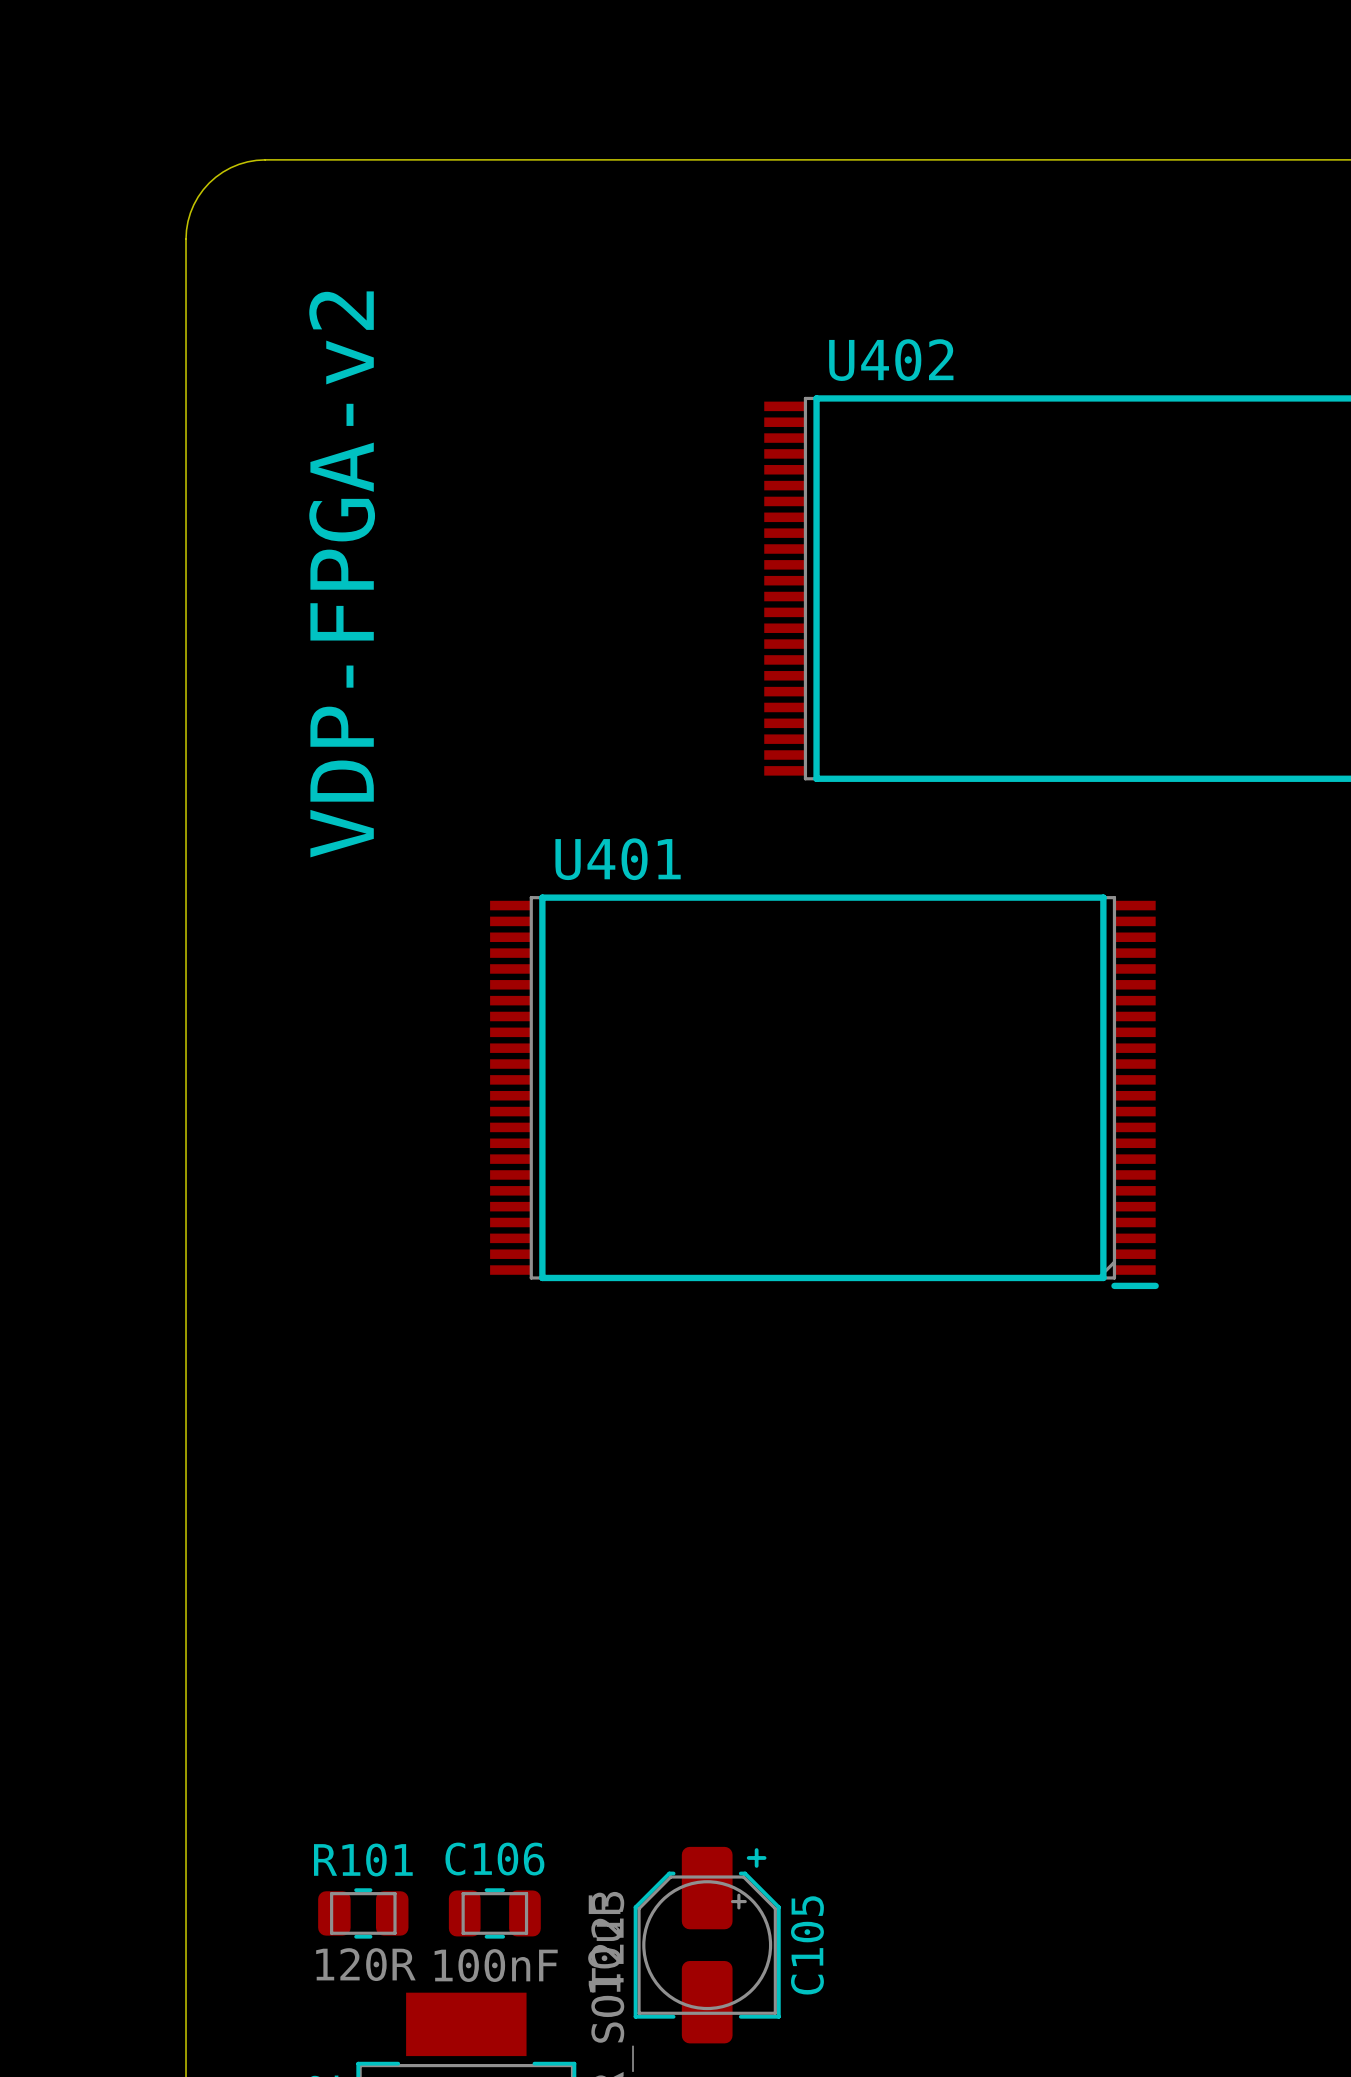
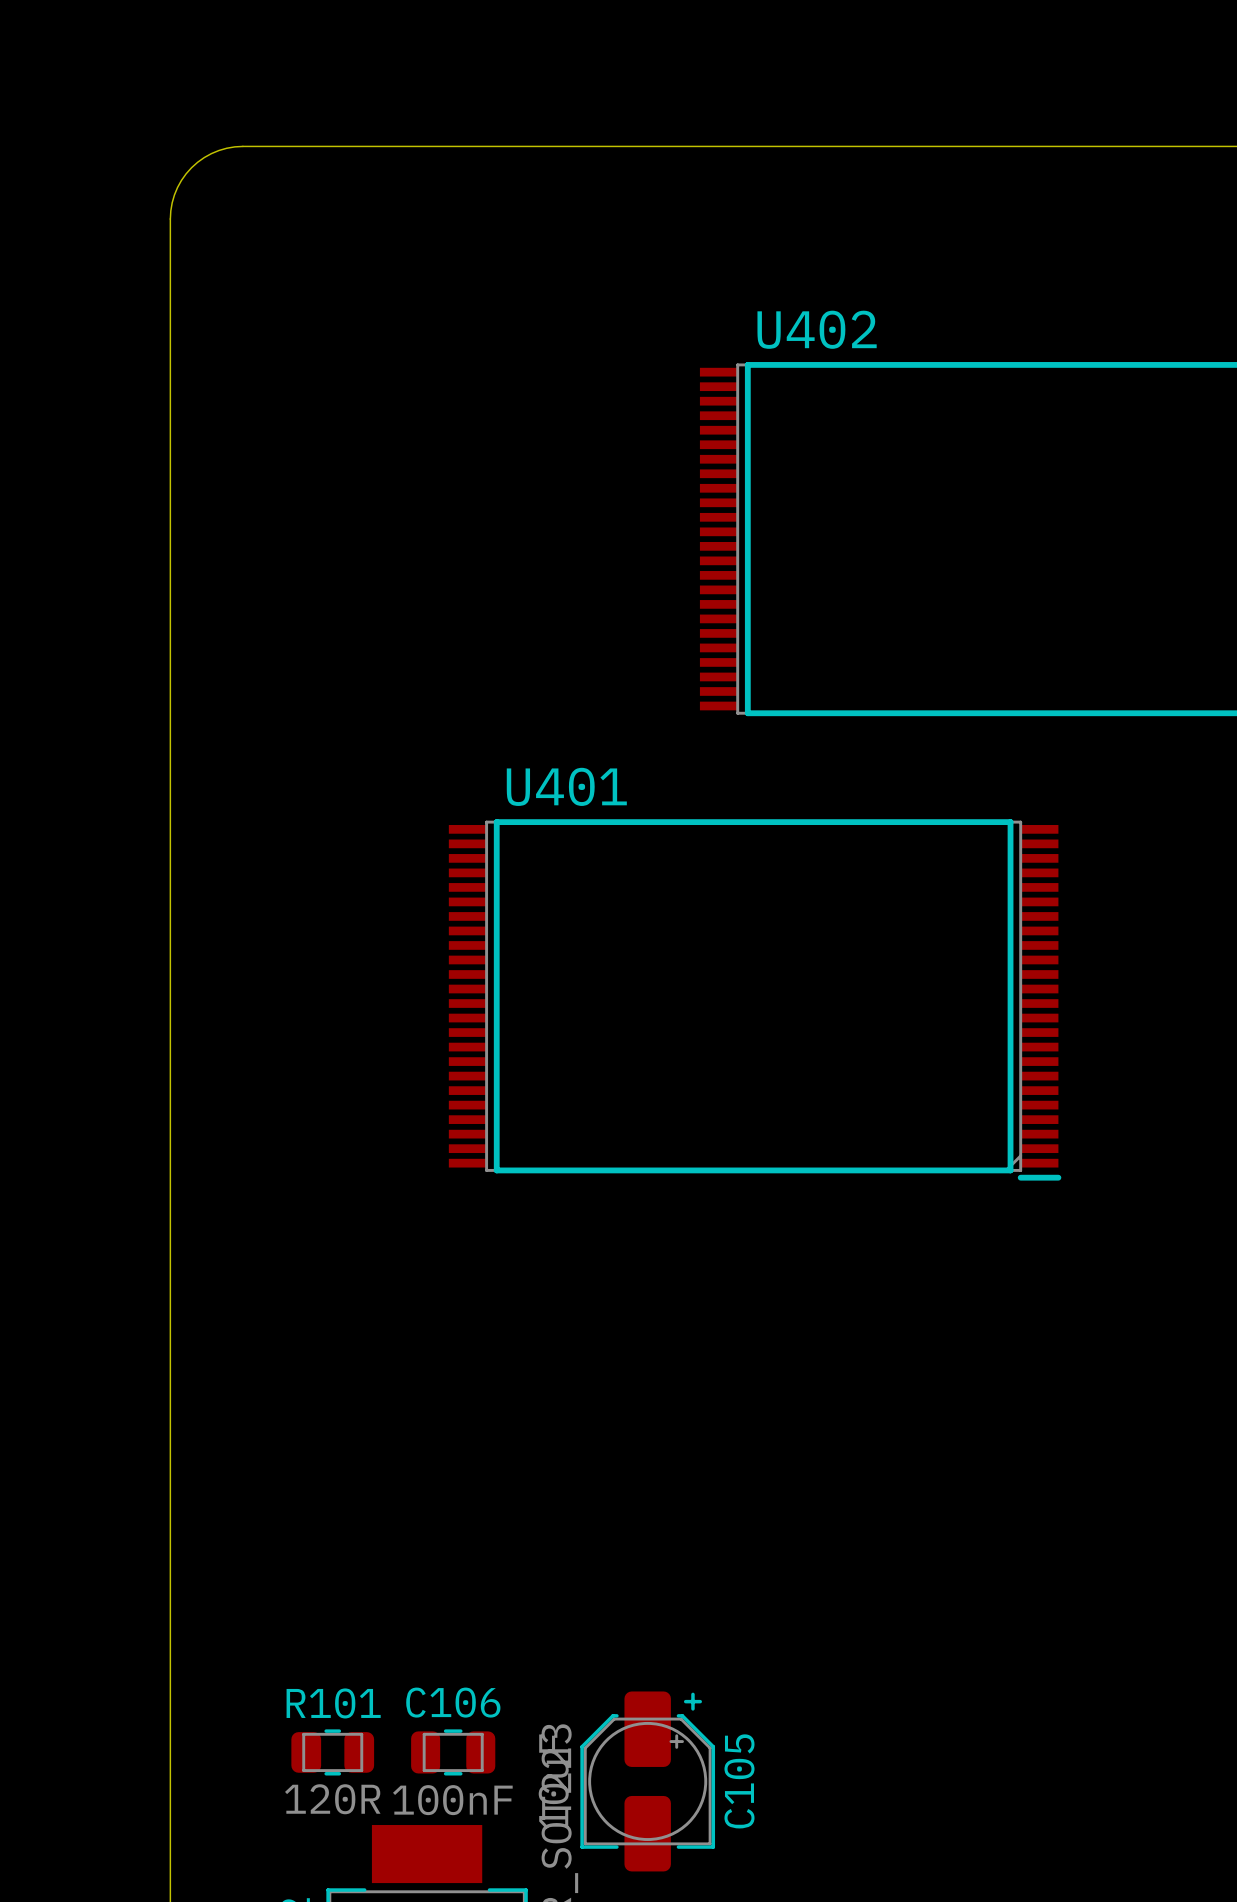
text: VDP-FPGA-v2 (342, 574) -> none

